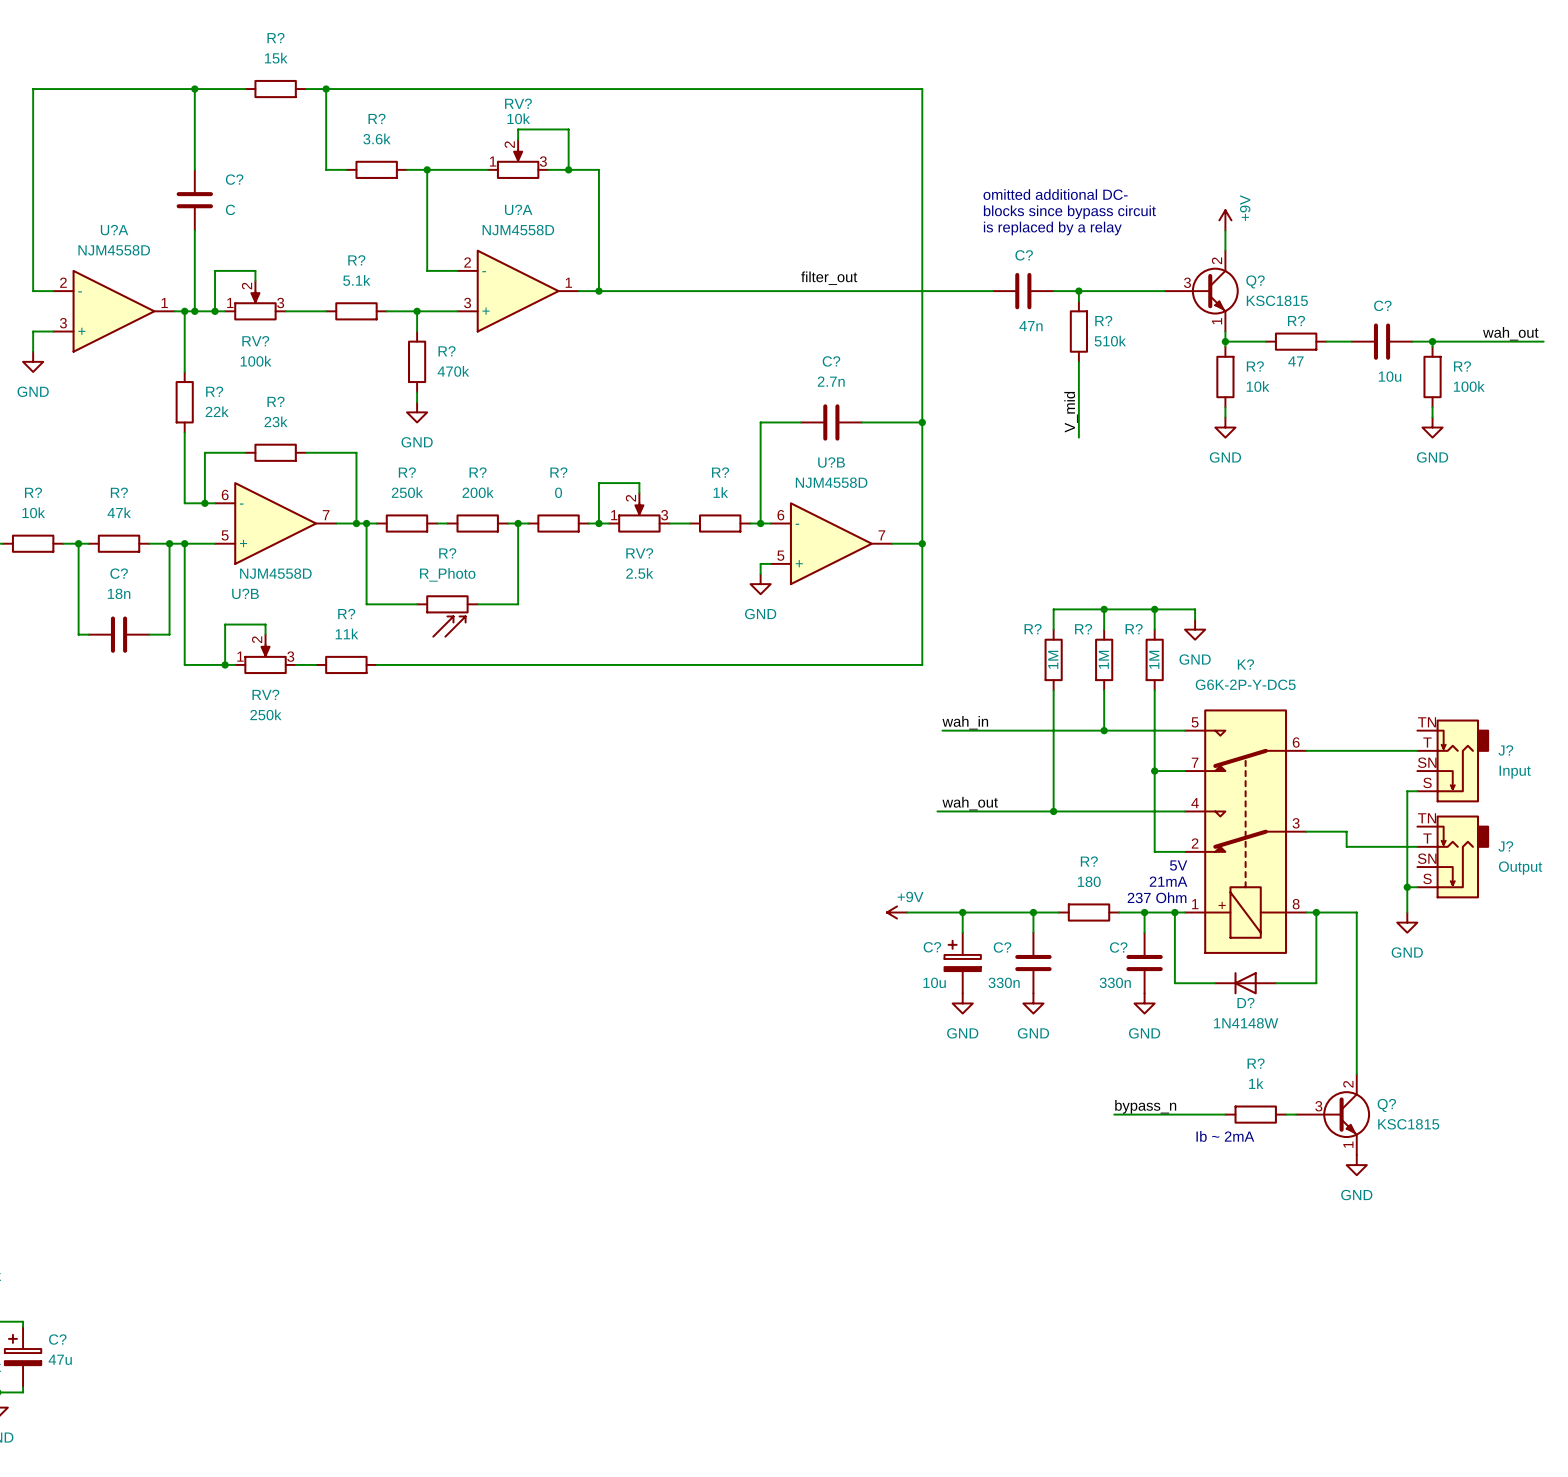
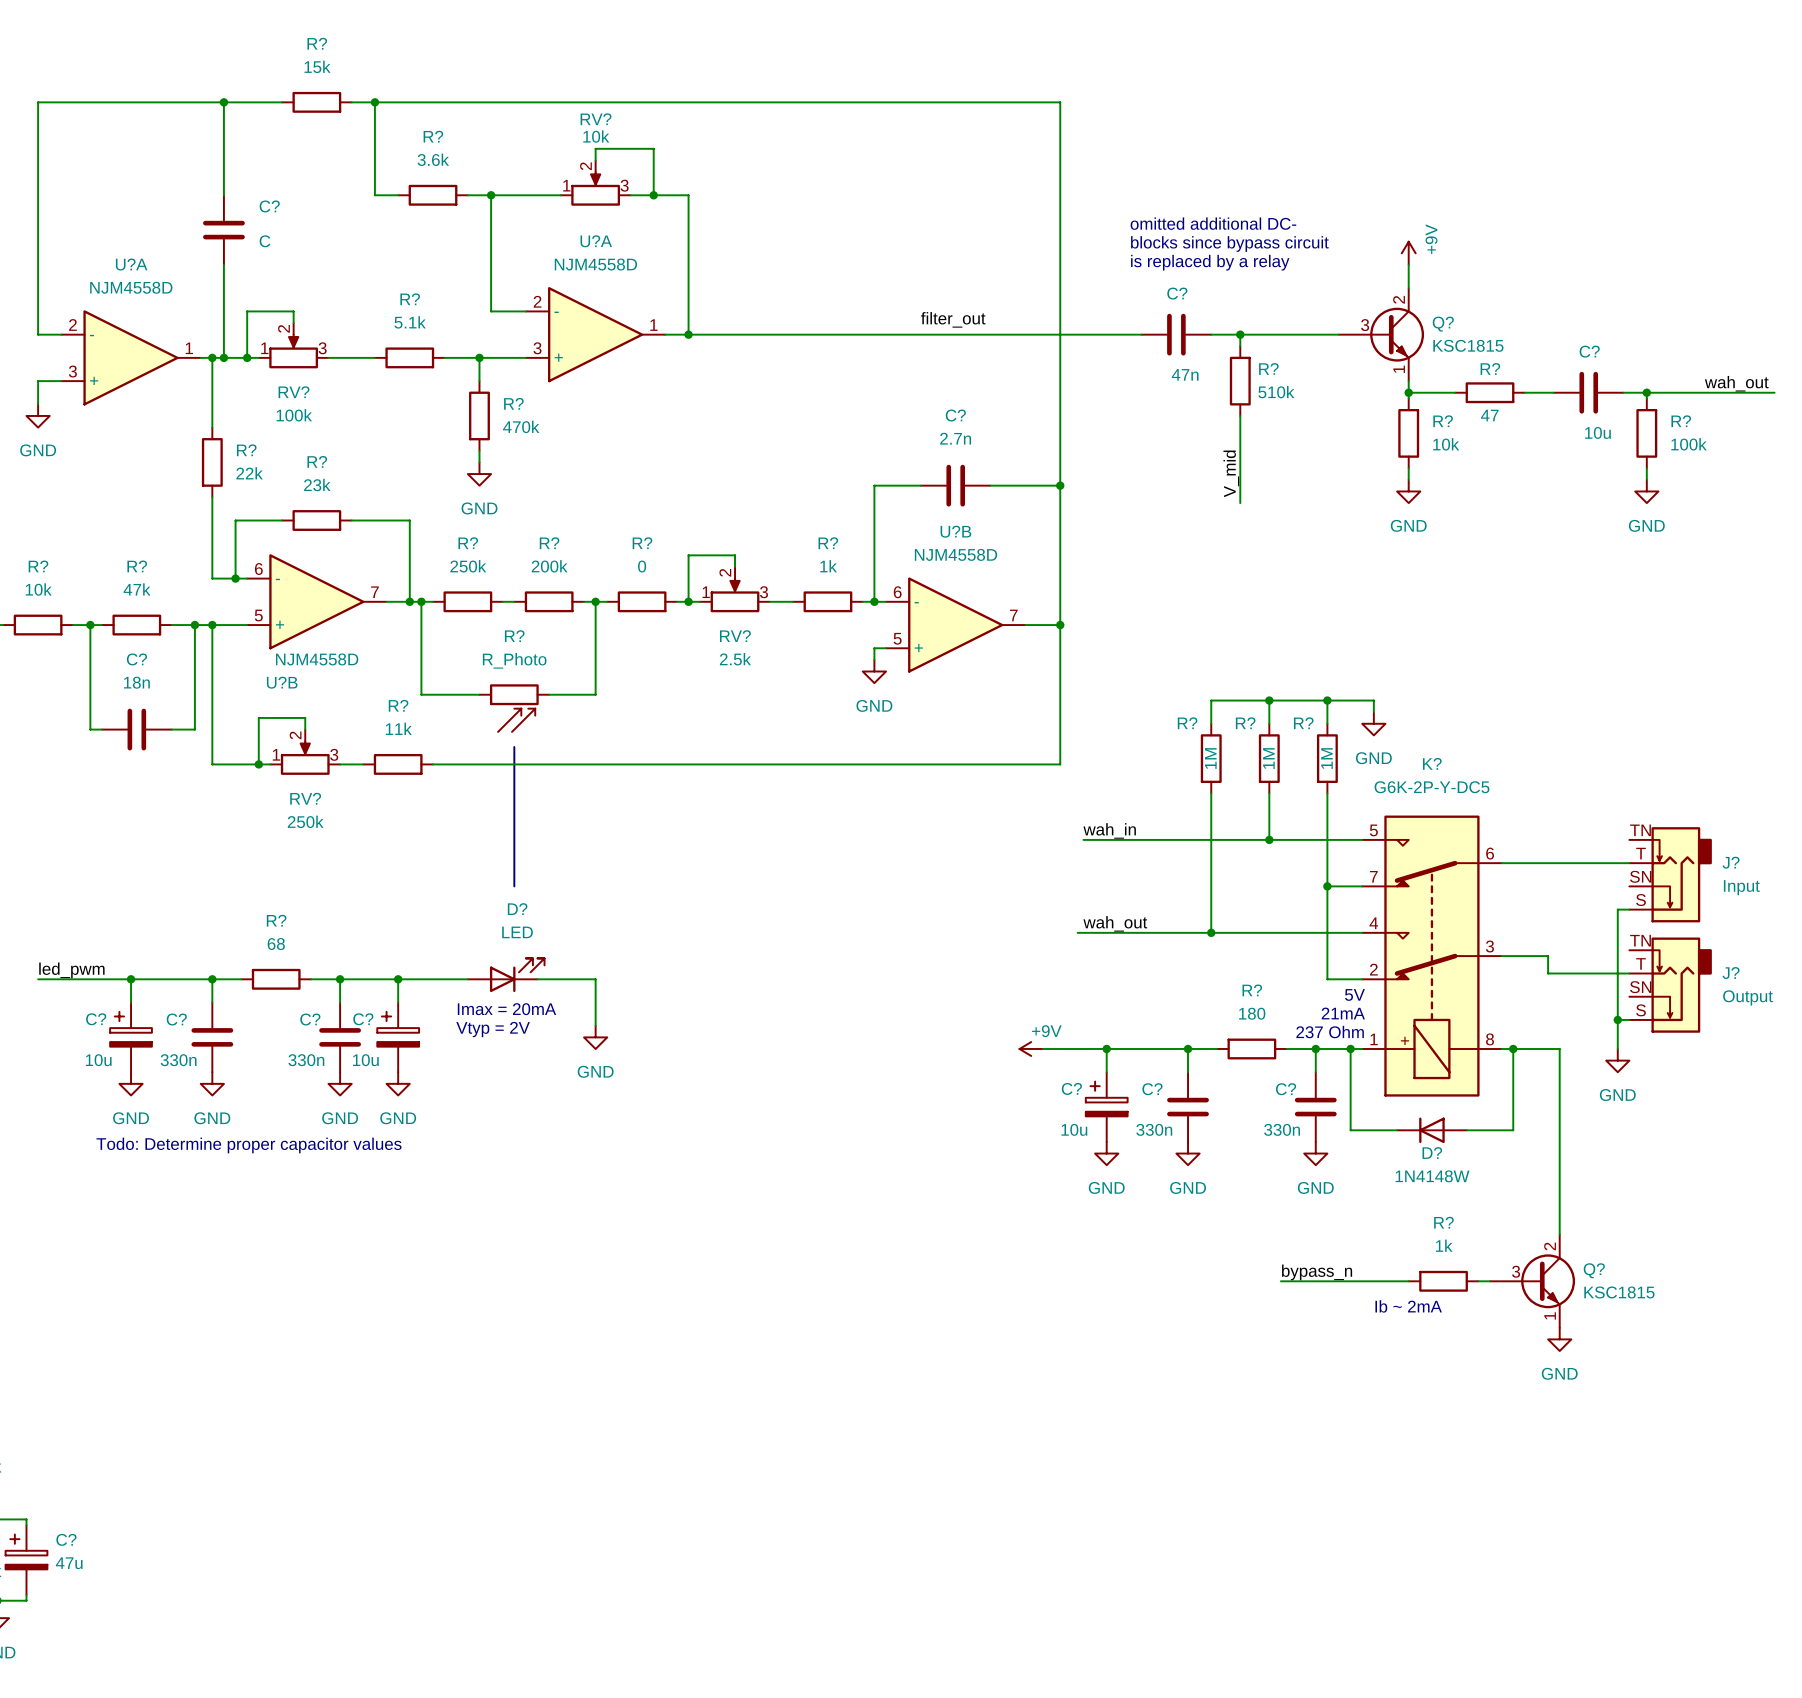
line: none -> (514, 747) (514, 886)
label: none -> led_pwm (71, 970)
D?: none -> LED (506, 975)
wire: none -> (38, 979) (241, 979)
wire: none -> (131, 979) (131, 1002)
junction: none -> (131, 979)
wire: none -> (212, 979) (212, 1002)
junction: none -> (212, 979)
R?: none -> 68 (276, 979)
wire: none -> (311, 979) (467, 979)
wire: none -> (340, 979) (340, 1002)
junction: none -> (340, 979)
wire: none -> (398, 979) (398, 1002)
junction: none -> (398, 979)
wire: none -> (537, 979) (595, 979) (595, 1025)
text: none -> Imax = 20mA (506, 1009)
text: none -> Vtyp = 2V (493, 1029)
C?: none -> 10u (131, 1037)
C?: none -> 330n (212, 1037)
C?: none -> 330n (340, 1037)
C?: none -> 10u (398, 1037)
power symbol: none -> GND (595, 1037)
power symbol: none -> GND (131, 1083)
power symbol: none -> GND (212, 1083)
power symbol: none -> GND (340, 1083)
power symbol: none -> GND (398, 1083)
text: none -> Todo: Determine proper capacitor values (249, 1145)

